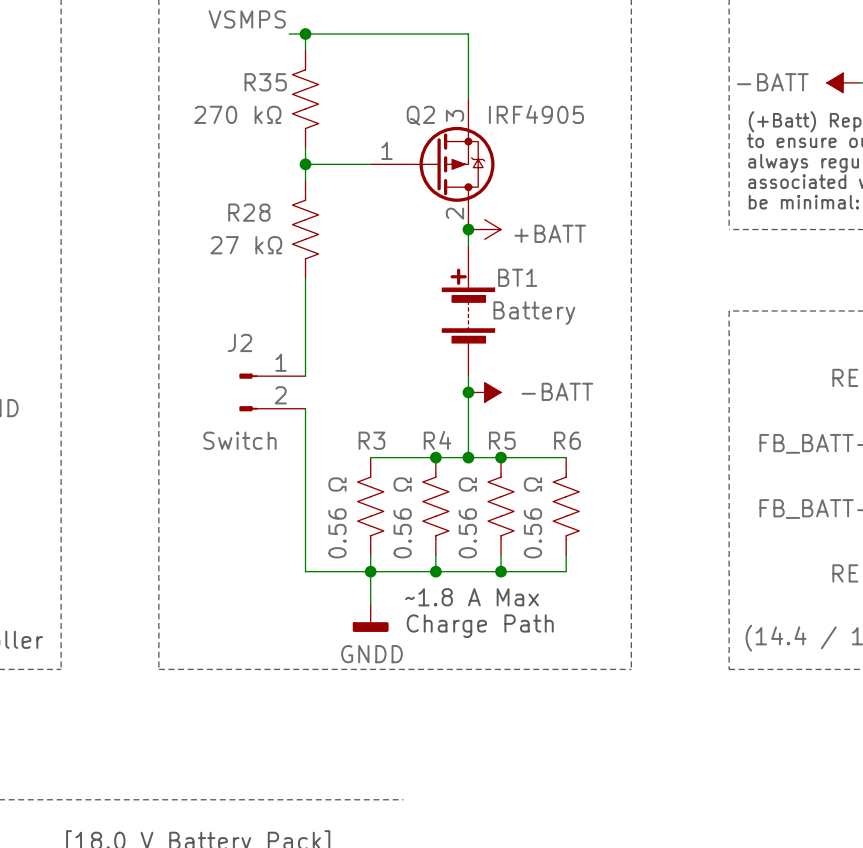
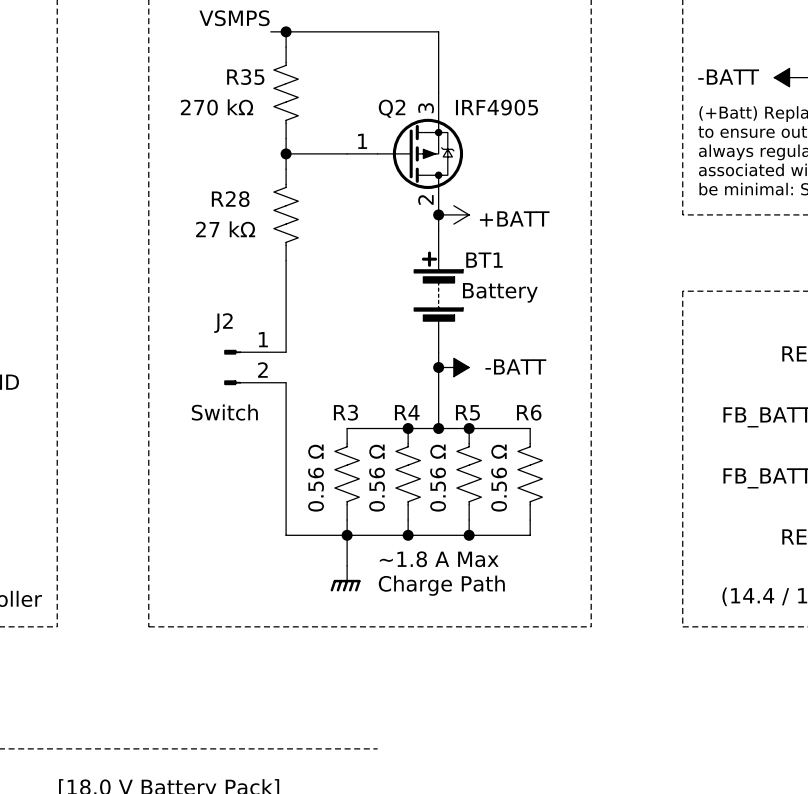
power symbol shape: [352, 604, 389, 632] -> [330, 565, 361, 592]
power symbol text: GNDD (371, 654) -> none

